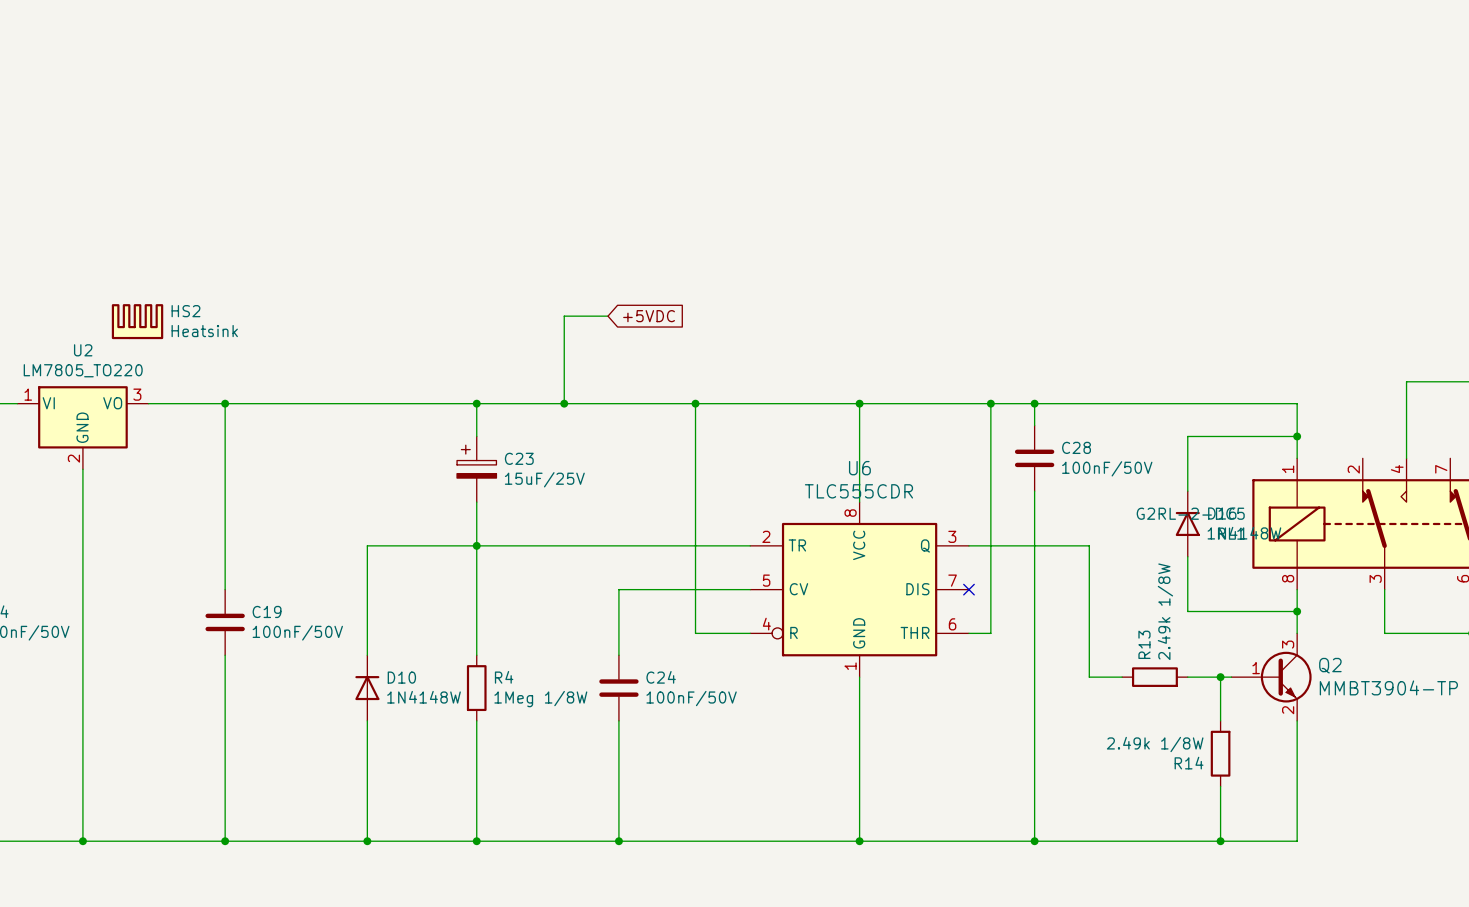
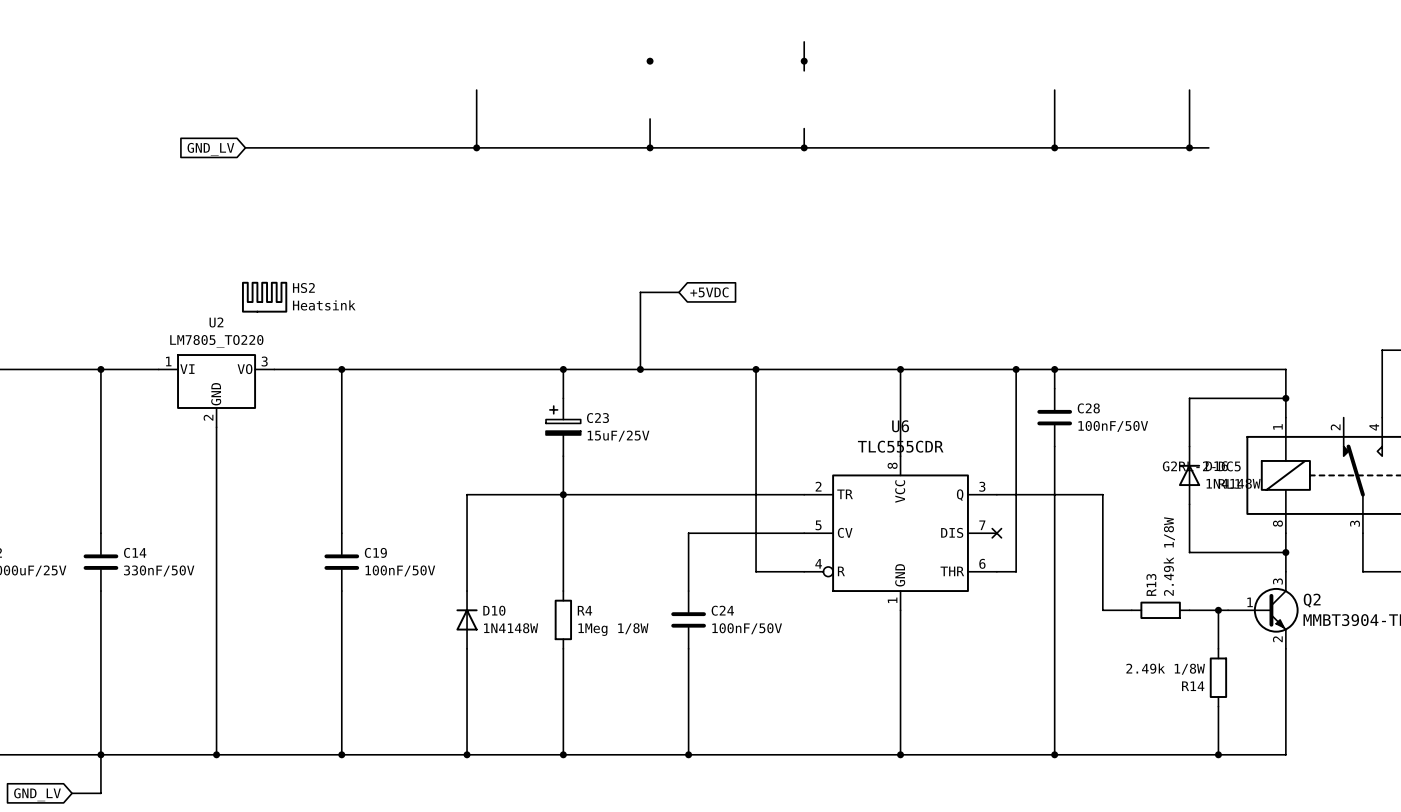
wire: none -> (804, 41) (804, 70)
junction: none -> (650, 61)
junction: none -> (804, 61)
wire: none -> (476, 90) (476, 147)
wire: none -> (1054, 90) (1054, 147)
wire: none -> (1189, 90) (1189, 147)
wire: none -> (650, 118) (650, 147)
wire: none -> (804, 128) (804, 147)
global label: none -> GND_LV (210, 149)
wire: none -> (245, 147) (1208, 147)
junction: none -> (476, 147)
junction: none -> (650, 147)
junction: none -> (804, 147)
junction: none -> (1054, 147)
junction: none -> (1189, 147)

